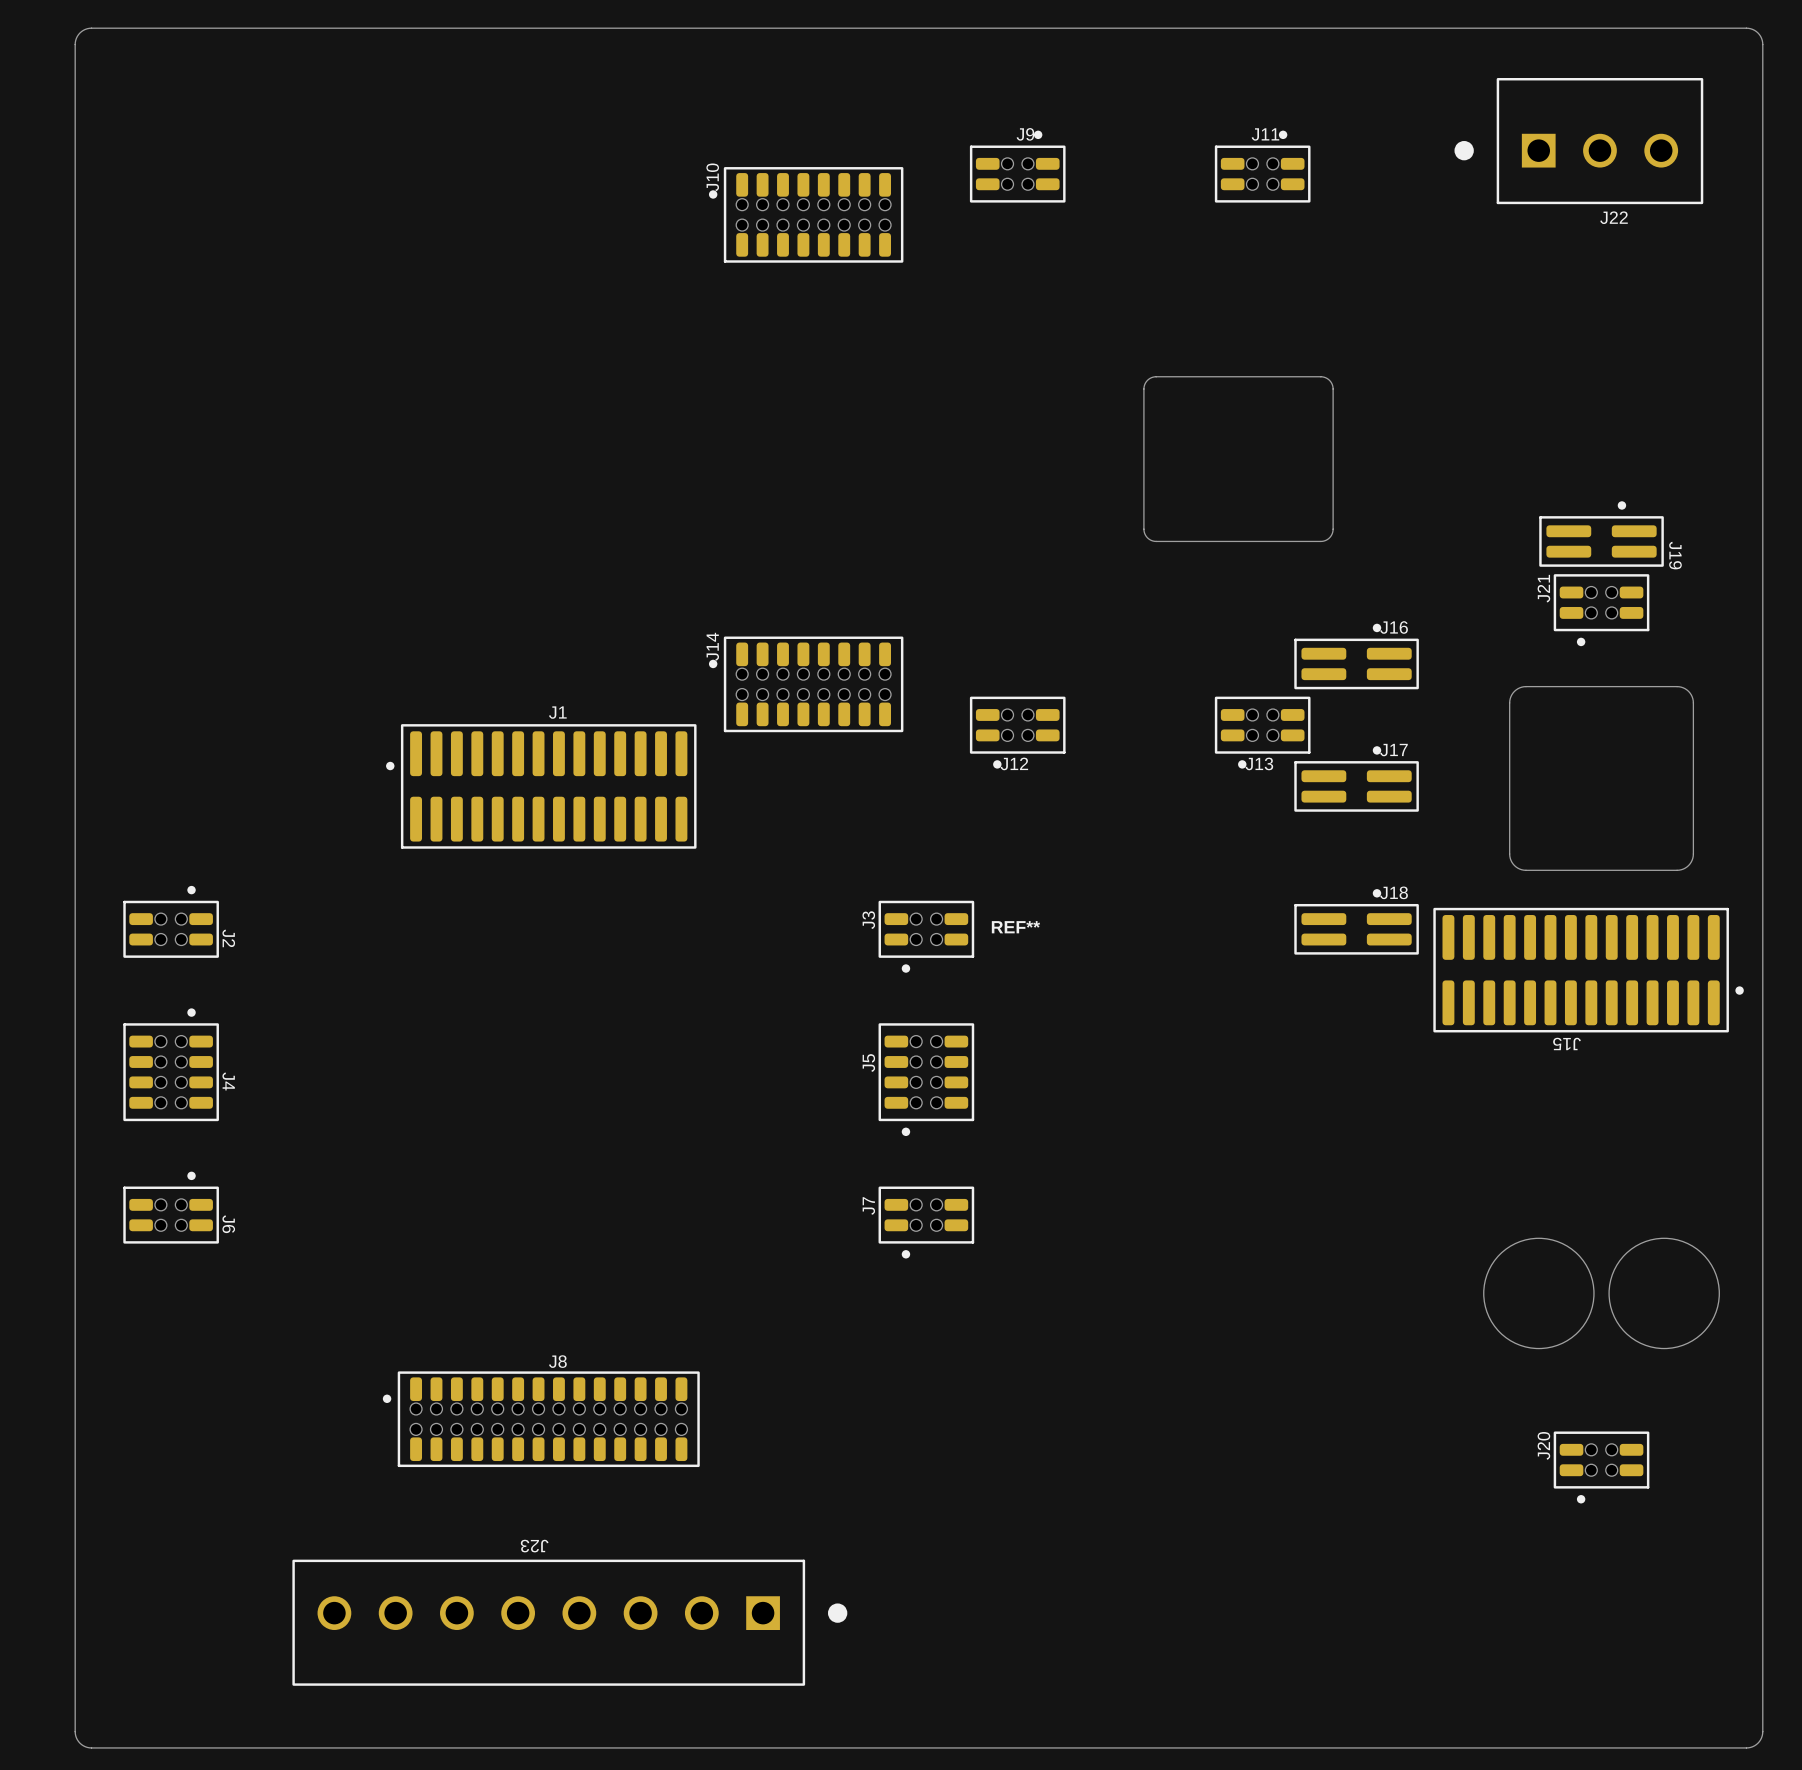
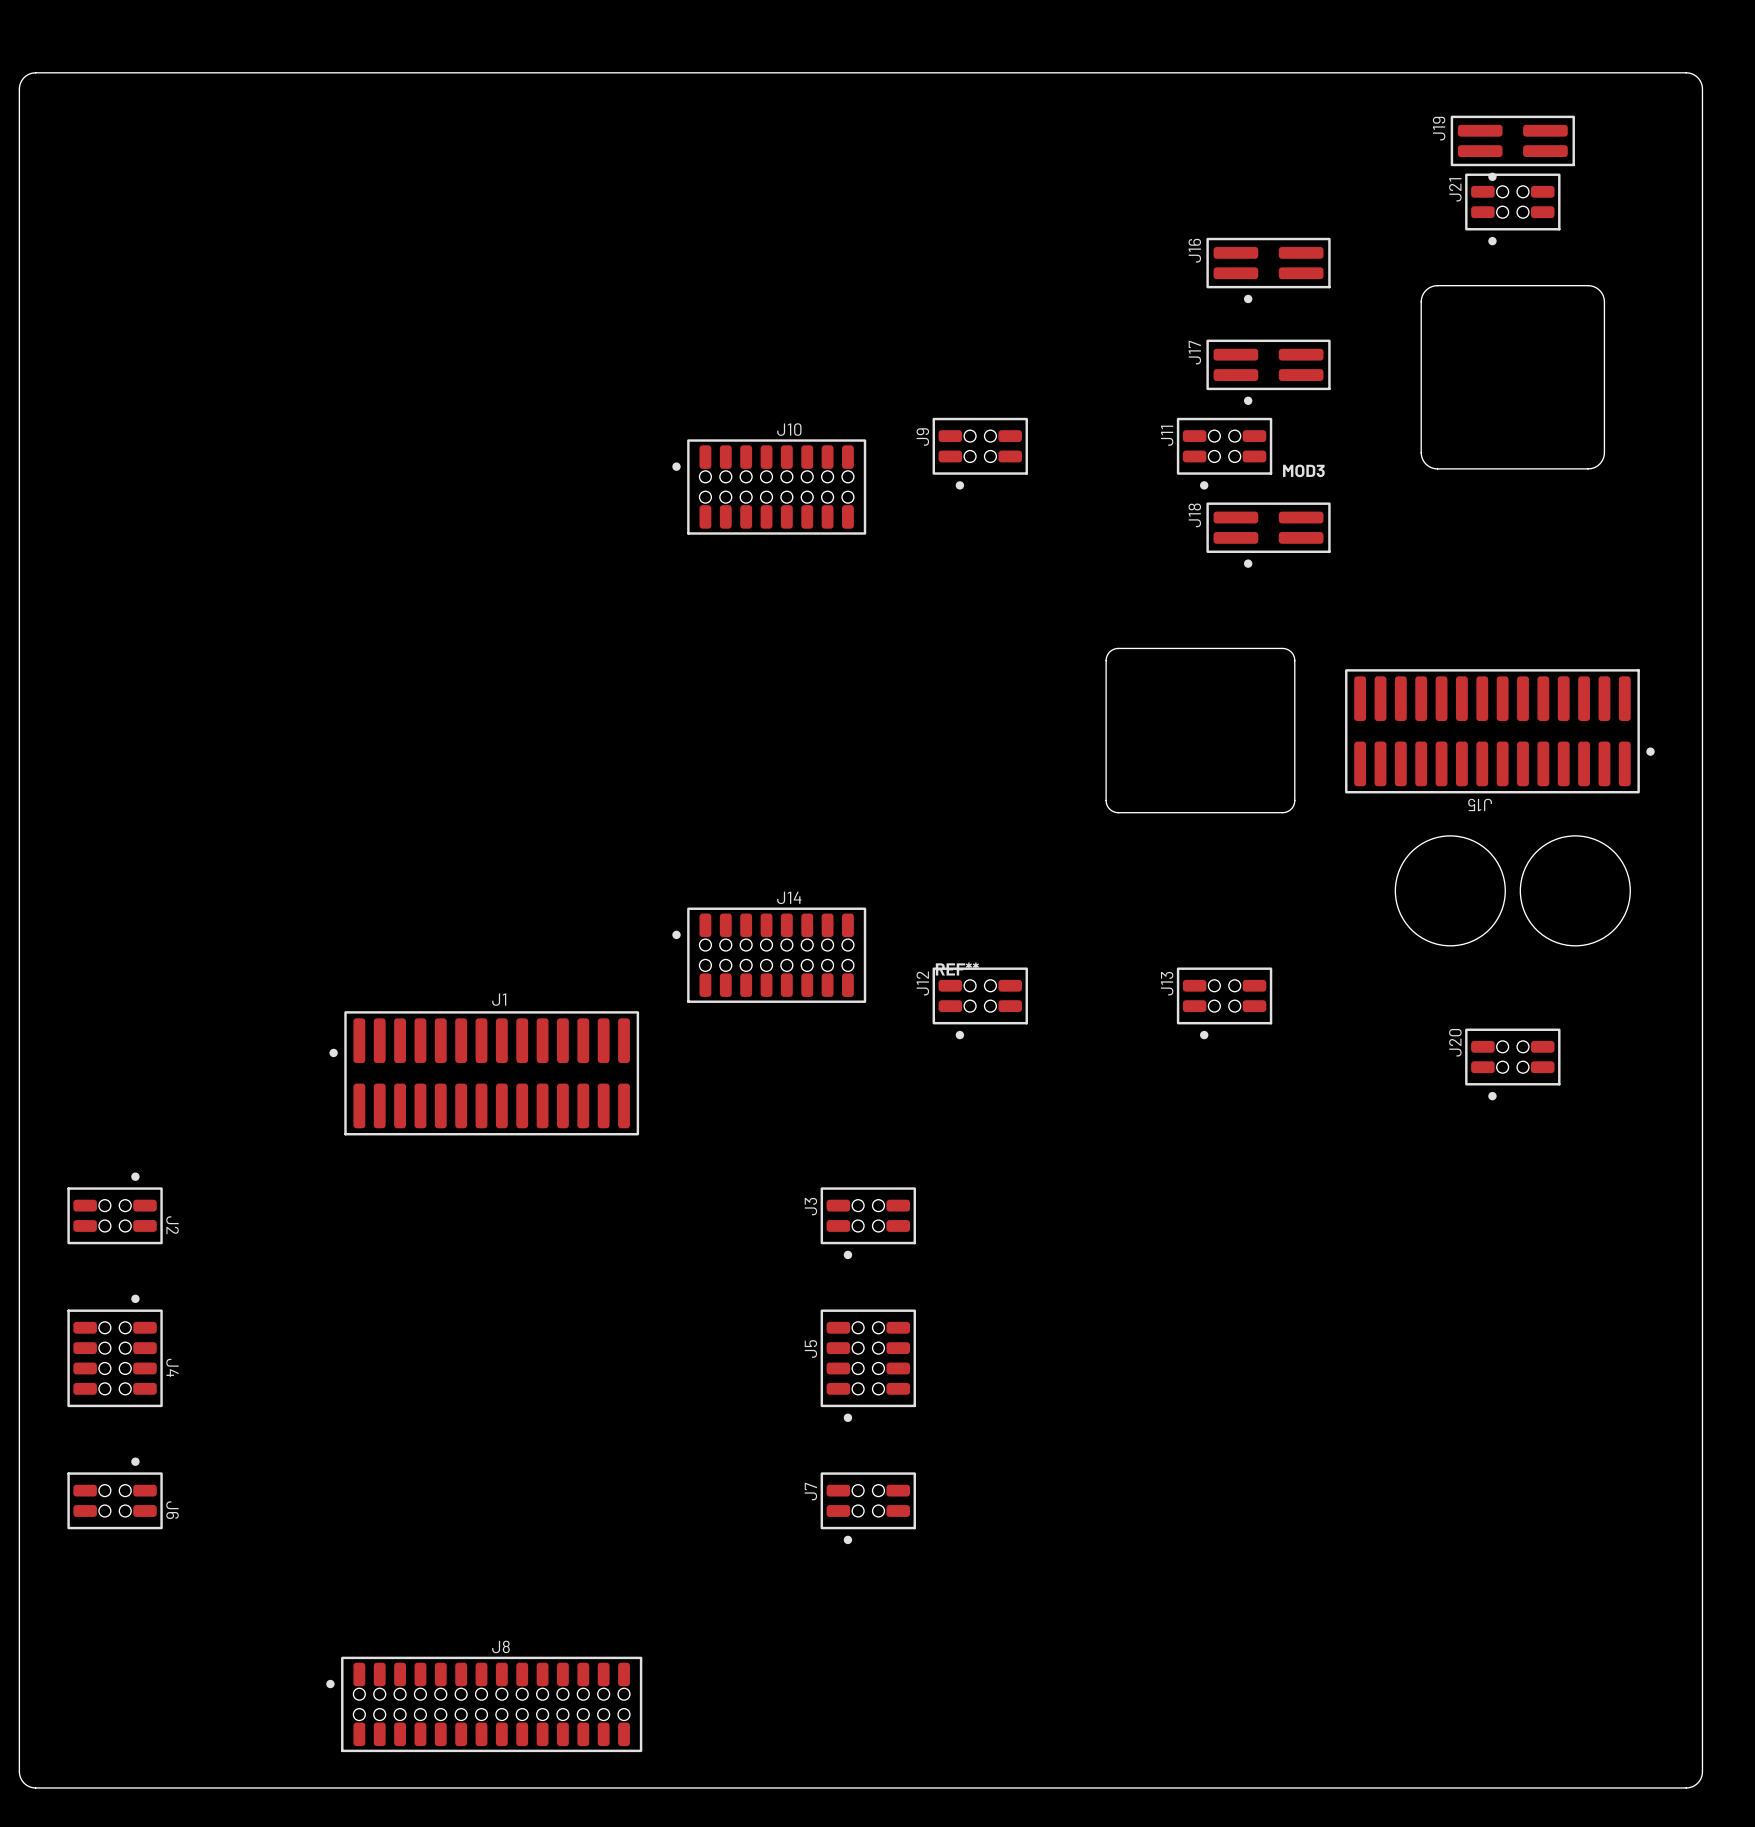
J9 name position: J9 (1025, 134) -> J9 (922, 437)
J11 name position: J11 (1265, 134) -> J11 (1167, 435)
J22: (1578, 141) -> none
J9 rotation: 0° (1017, 166) -> 180° (980, 453)
J9 position: (1017, 166) -> (980, 453)
J11 rotation: 0° (1262, 166) -> 180° (1224, 453)
J11 position: (1262, 166) -> (1224, 453)
J10 name rotation: 0° (712, 177) -> 90° clockwise (789, 429)
J10 name position: J10 (712, 177) -> J10 (789, 429)
J10 position: (806, 214) -> (769, 487)
drawing: none -> [1394, 285, 1631, 947]
drawing: [1143, 376, 1334, 542] -> none
J19 rotation: 0° (1601, 534) -> 180° (1512, 148)
J19 position: (1601, 534) -> (1512, 148)
J21 position: (1601, 610) -> (1512, 209)
J16 name position: J16 (1394, 627) -> J16 (1194, 250)
J14 name rotation: 0° (712, 646) -> 90° clockwise (789, 897)
J14 name position: J14 (712, 646) -> J14 (789, 897)
J16 rotation: 0° (1356, 656) -> 180° (1268, 270)
J16 position: (1356, 656) -> (1268, 270)
J14 position: (806, 684) -> (769, 955)
drawing: [1483, 686, 1720, 1349] -> none
MOD3: none -> (1200, 730)
J12 position: (1017, 732) -> (980, 1003)
J13 position: (1262, 732) -> (1224, 1003)
J17 name position: J17 (1394, 750) -> J17 (1194, 352)
J12 name rotation: 0° (1014, 763) -> 90° counterclockwise (922, 983)
J12 name position: J12 (1014, 763) -> J12 (922, 983)
J13 name rotation: 0° (1259, 763) -> 90° counterclockwise (1167, 983)
J13 name position: J13 (1259, 763) -> J13 (1167, 983)
J17 rotation: 0° (1356, 778) -> 180° (1268, 372)
J17 position: (1356, 778) -> (1268, 372)
J1 position: (541, 786) -> (484, 1073)
J18 name position: J18 (1394, 892) -> J18 (1194, 515)
J2 position: (171, 921) -> (115, 1208)
J18 rotation: 0° (1356, 921) -> 180° (1268, 535)
J18 position: (1356, 921) -> (1268, 535)
J3 position: (926, 936) -> (868, 1223)
J15 position: (1588, 970) -> (1499, 731)
J4 position: (171, 1064) -> (115, 1350)
J5 position: (926, 1079) -> (868, 1365)
J6 position: (171, 1207) -> (115, 1493)
J7 position: (926, 1222) -> (868, 1508)
J8 position: (541, 1419) -> (484, 1704)
J20 position: (1601, 1467) -> (1512, 1064)
J23: (569, 1622) -> none

